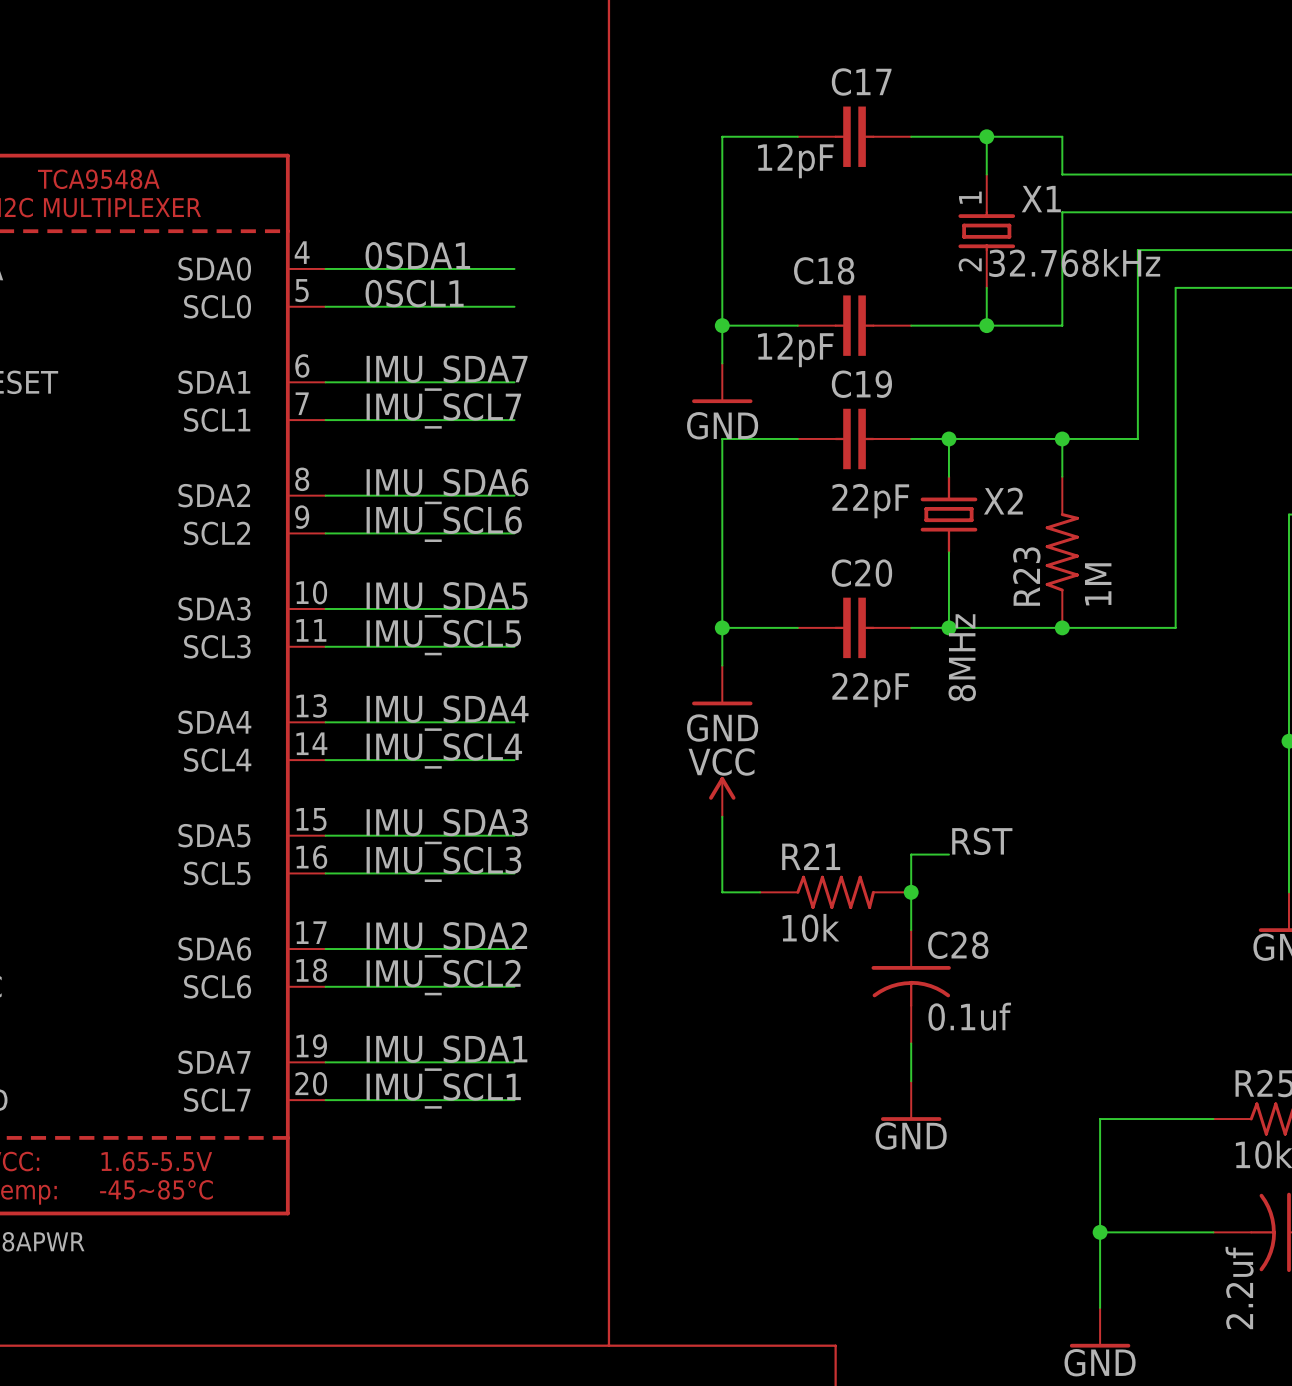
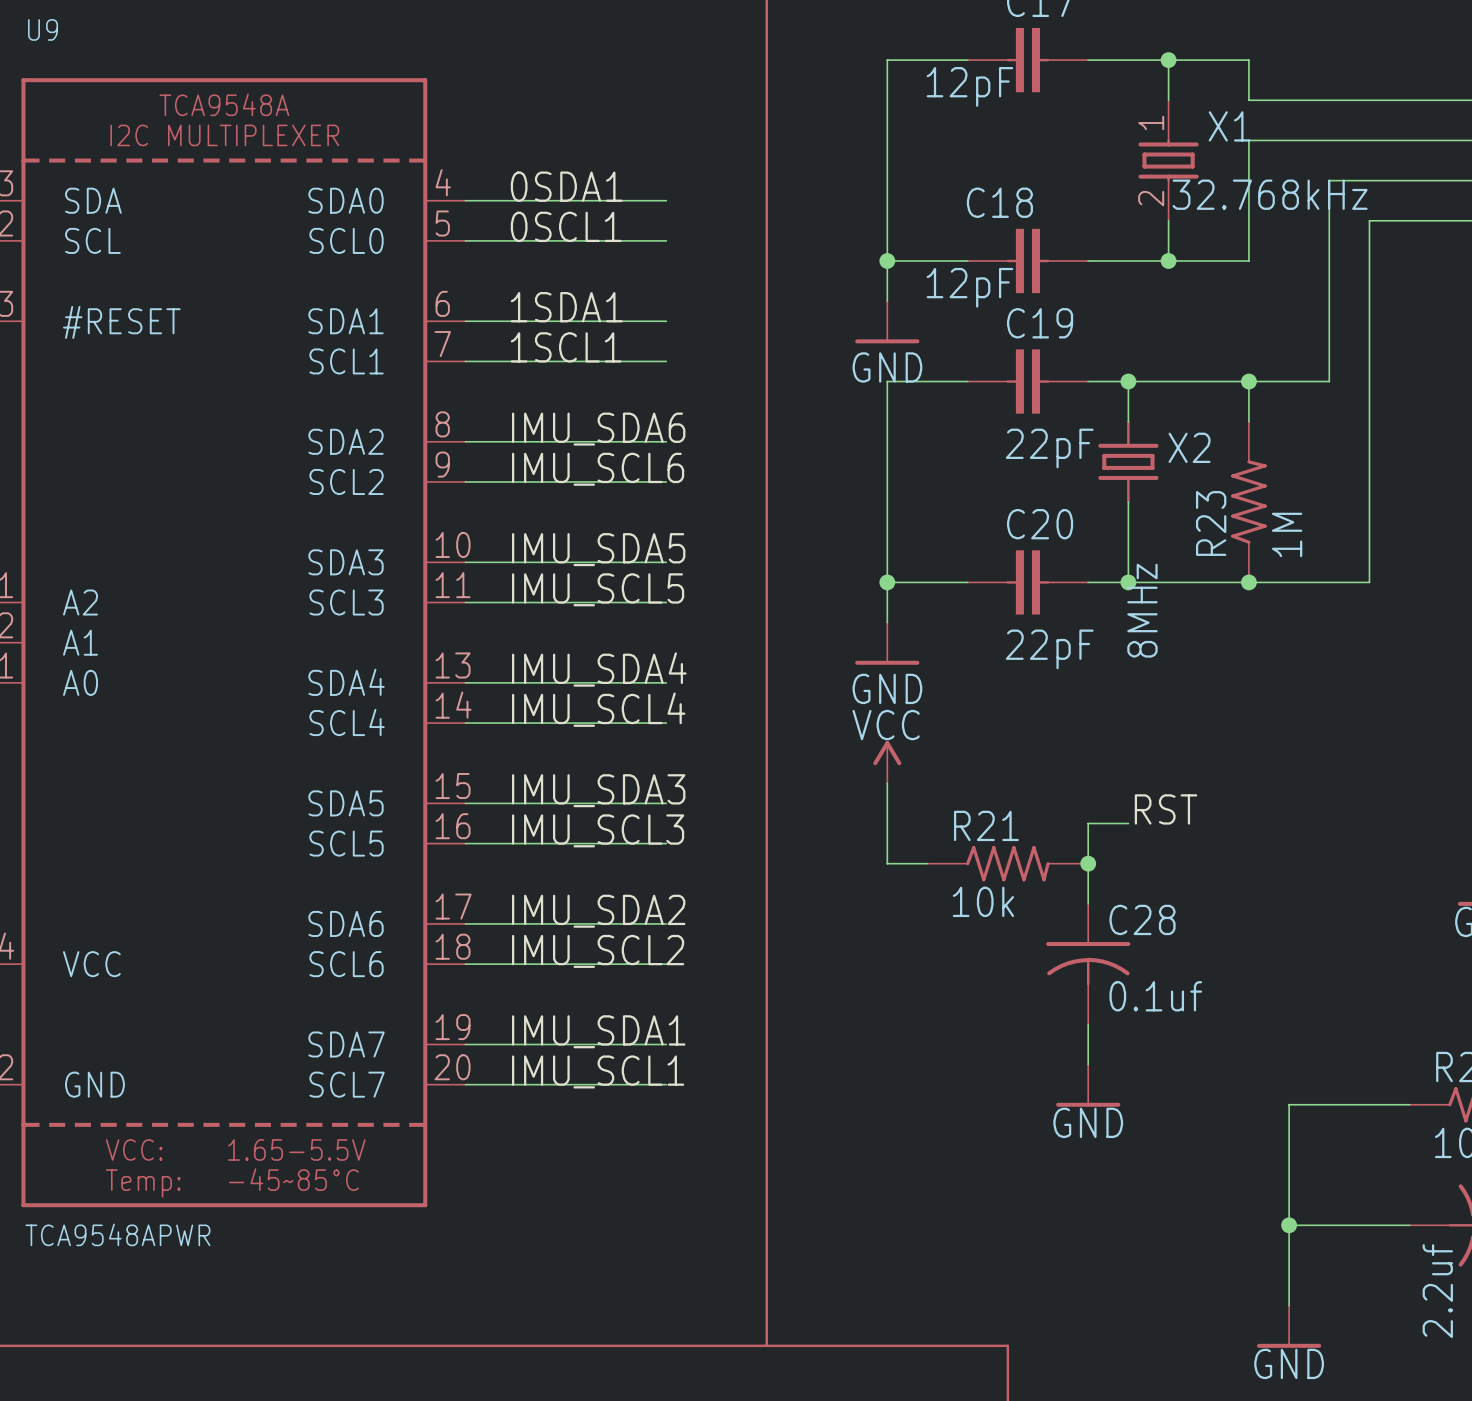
label: IMU_SDA7 (447, 373) -> 1SDA1 (566, 307)
label: IMU_SCL7 (443, 410) -> 1SCL1 (566, 347)

